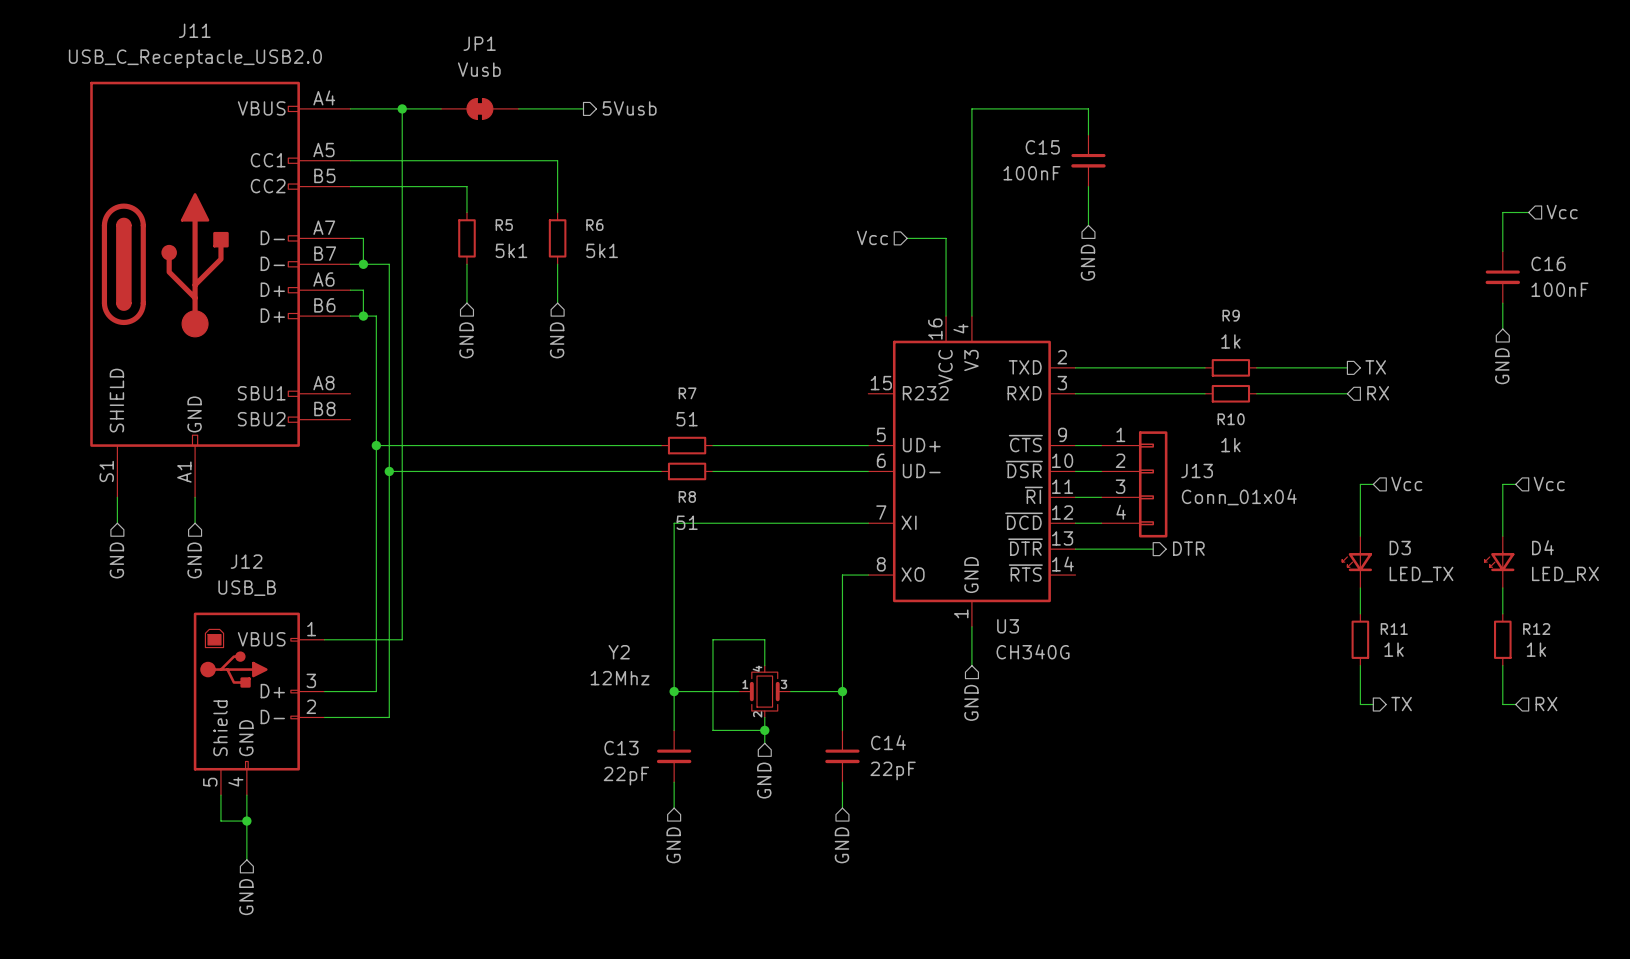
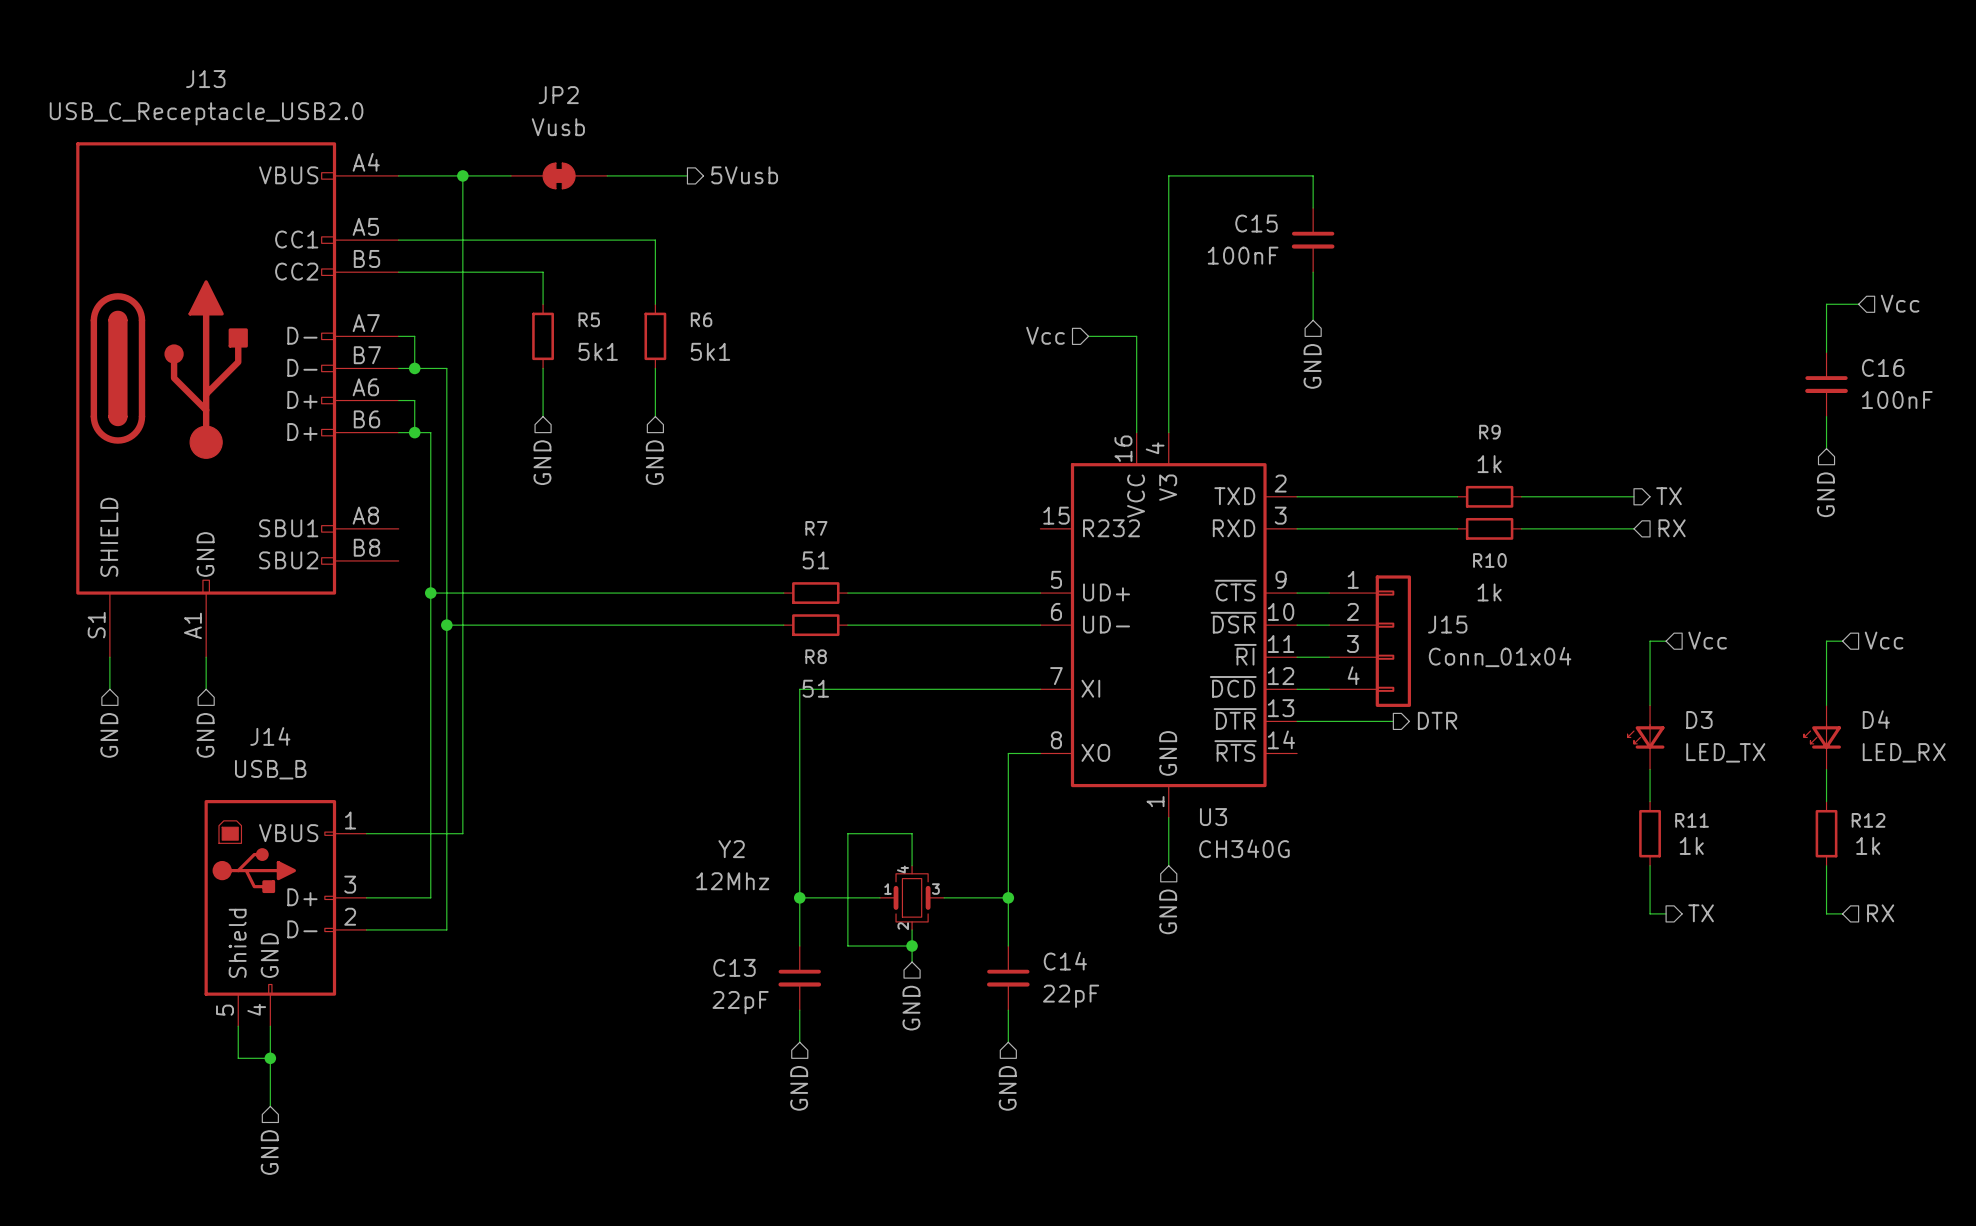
J11 name: J11 (194, 30) -> J13 (205, 79)
JP1 name: JP1 (479, 43) -> JP2 (558, 95)
J13 name: J13 (1197, 470) -> J15 (1447, 624)
J12 name: J12 (246, 561) -> J14 (270, 736)

